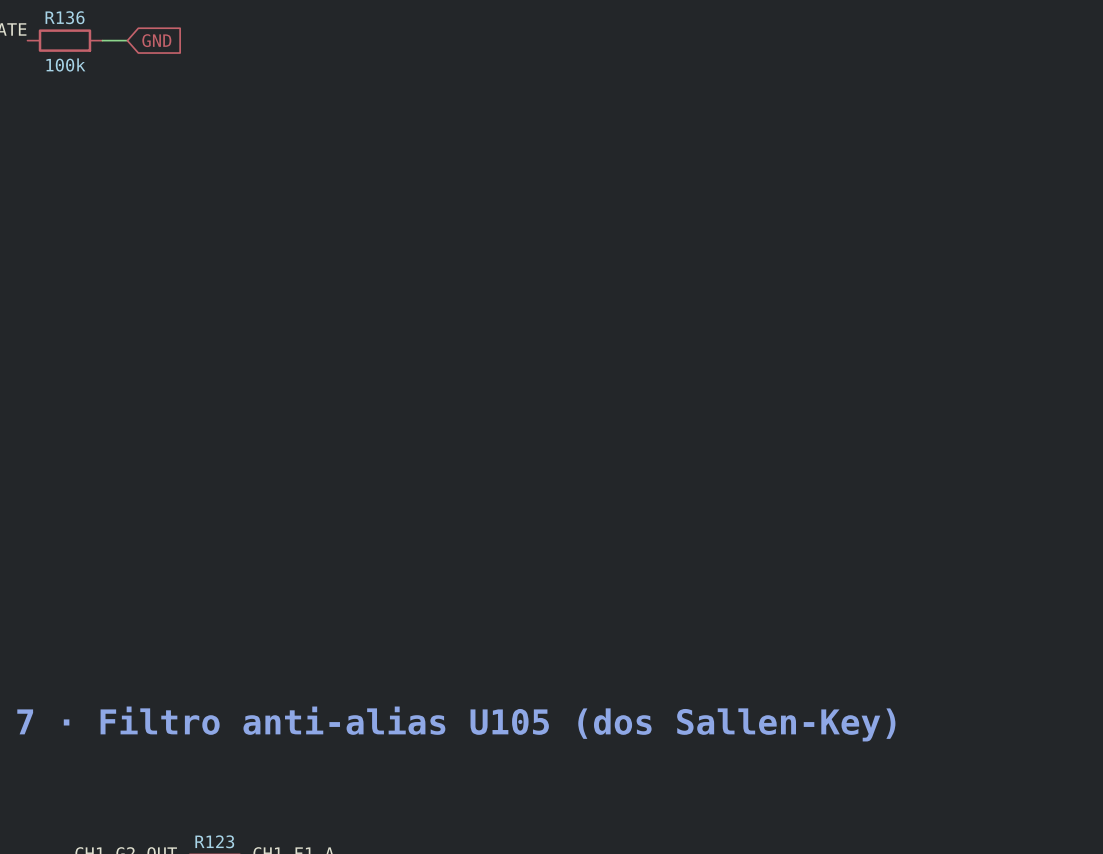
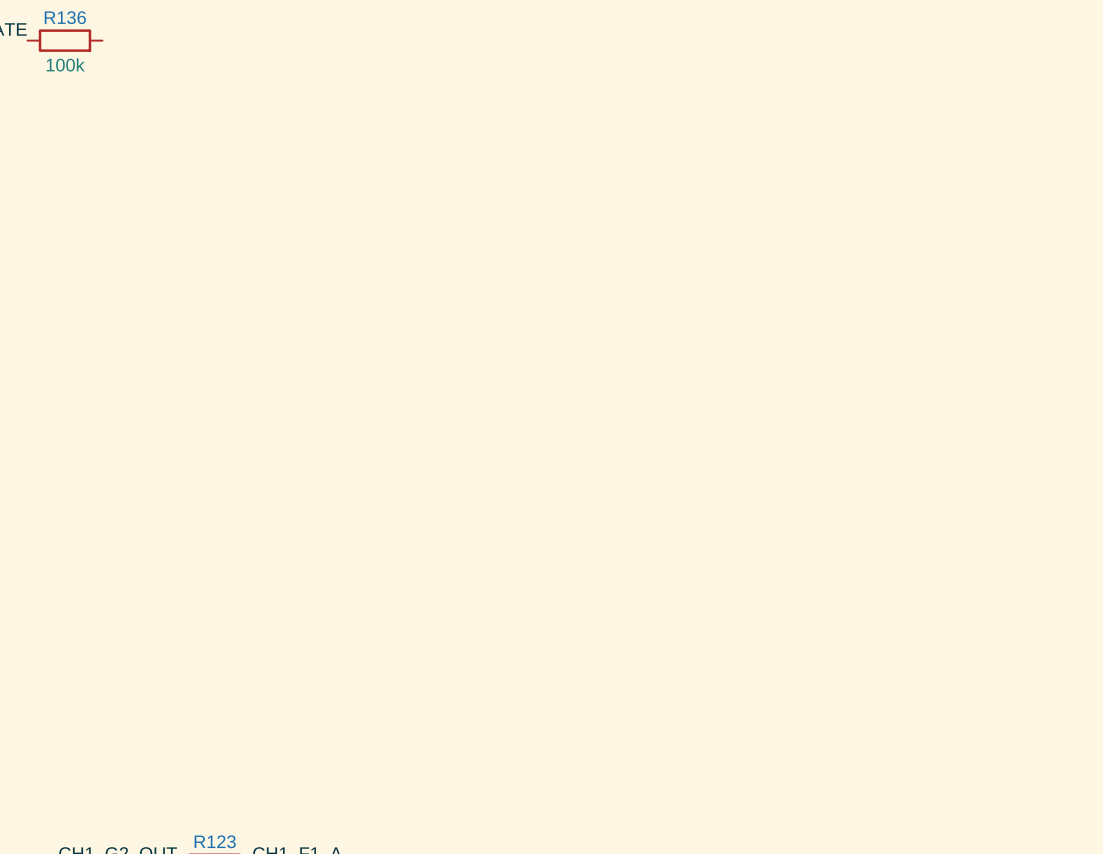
wire: (102, 40) (127, 40) -> none
global label: GND (156, 40) -> none
text: 7 · Filtro anti-alias U105 (dos Sallen-Key) (456, 723) -> none

